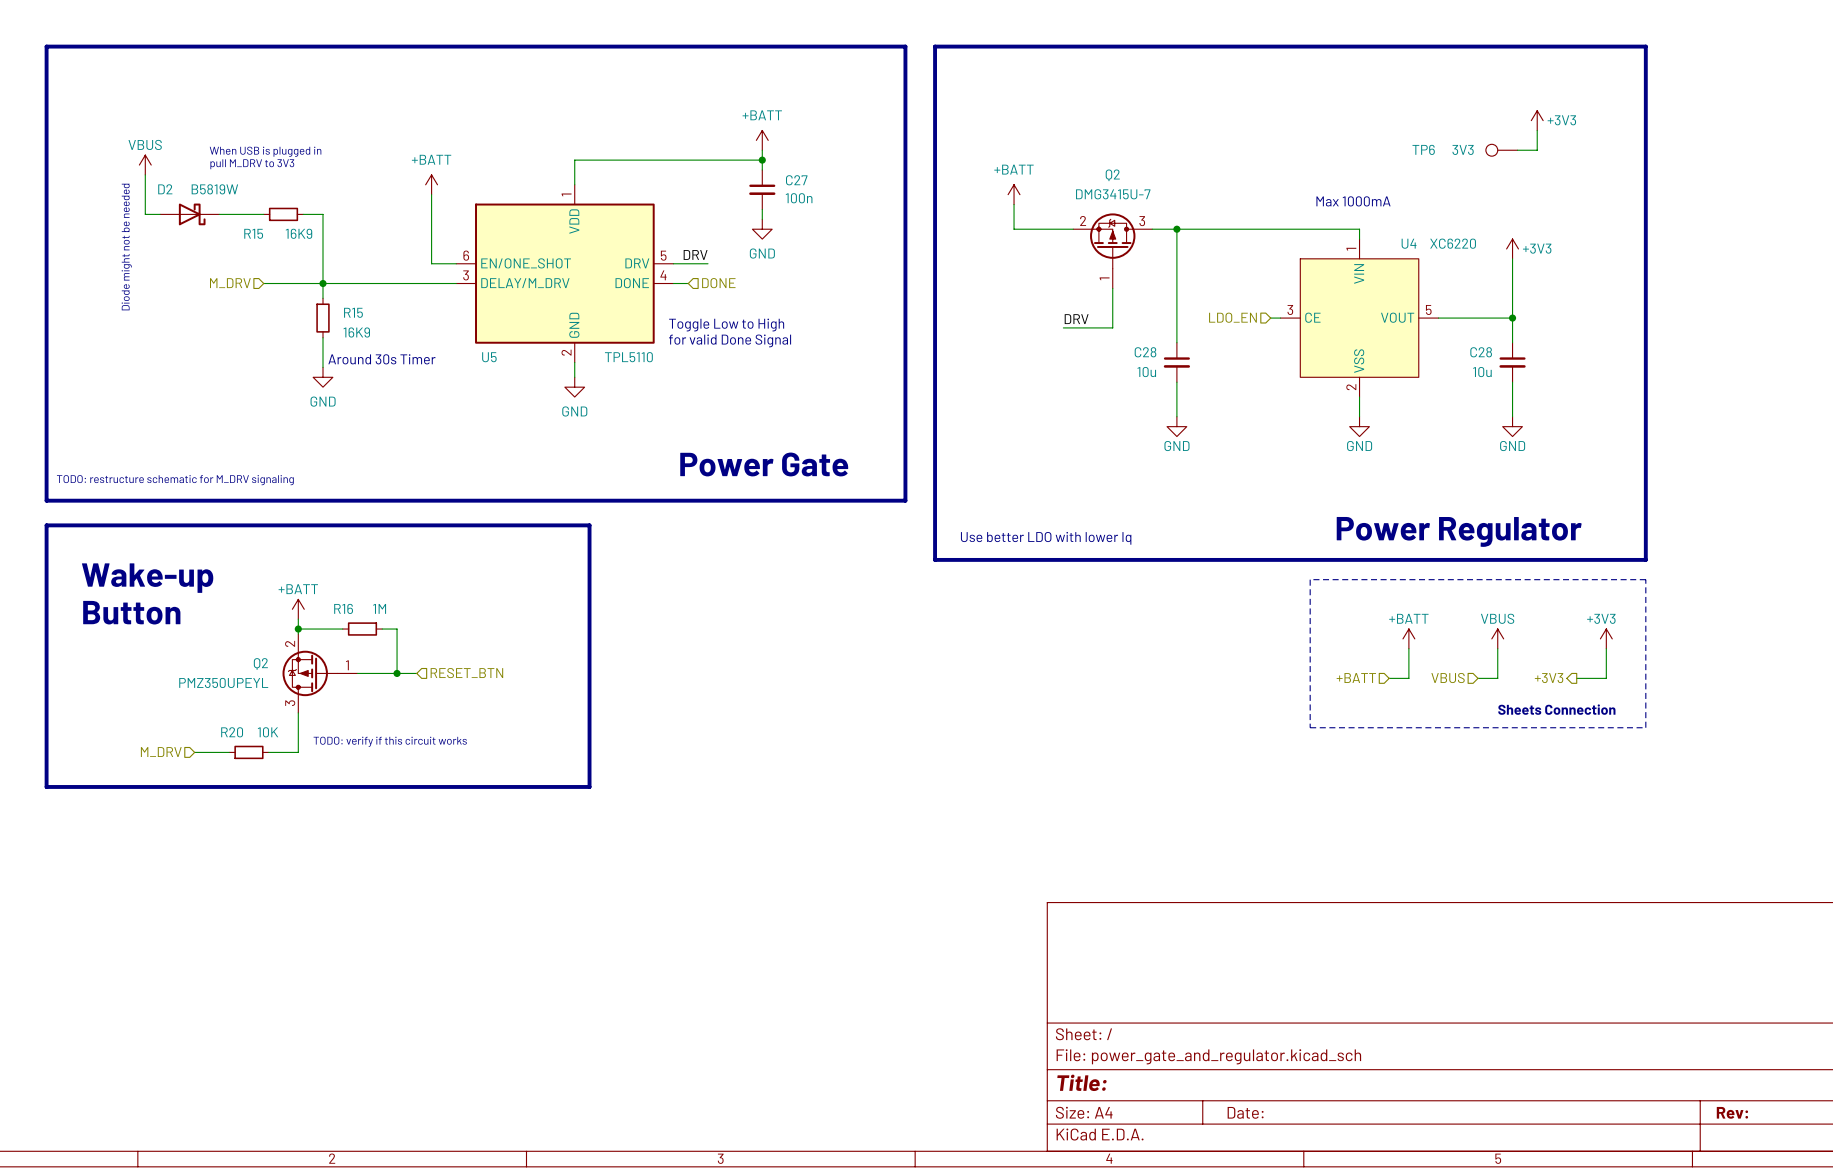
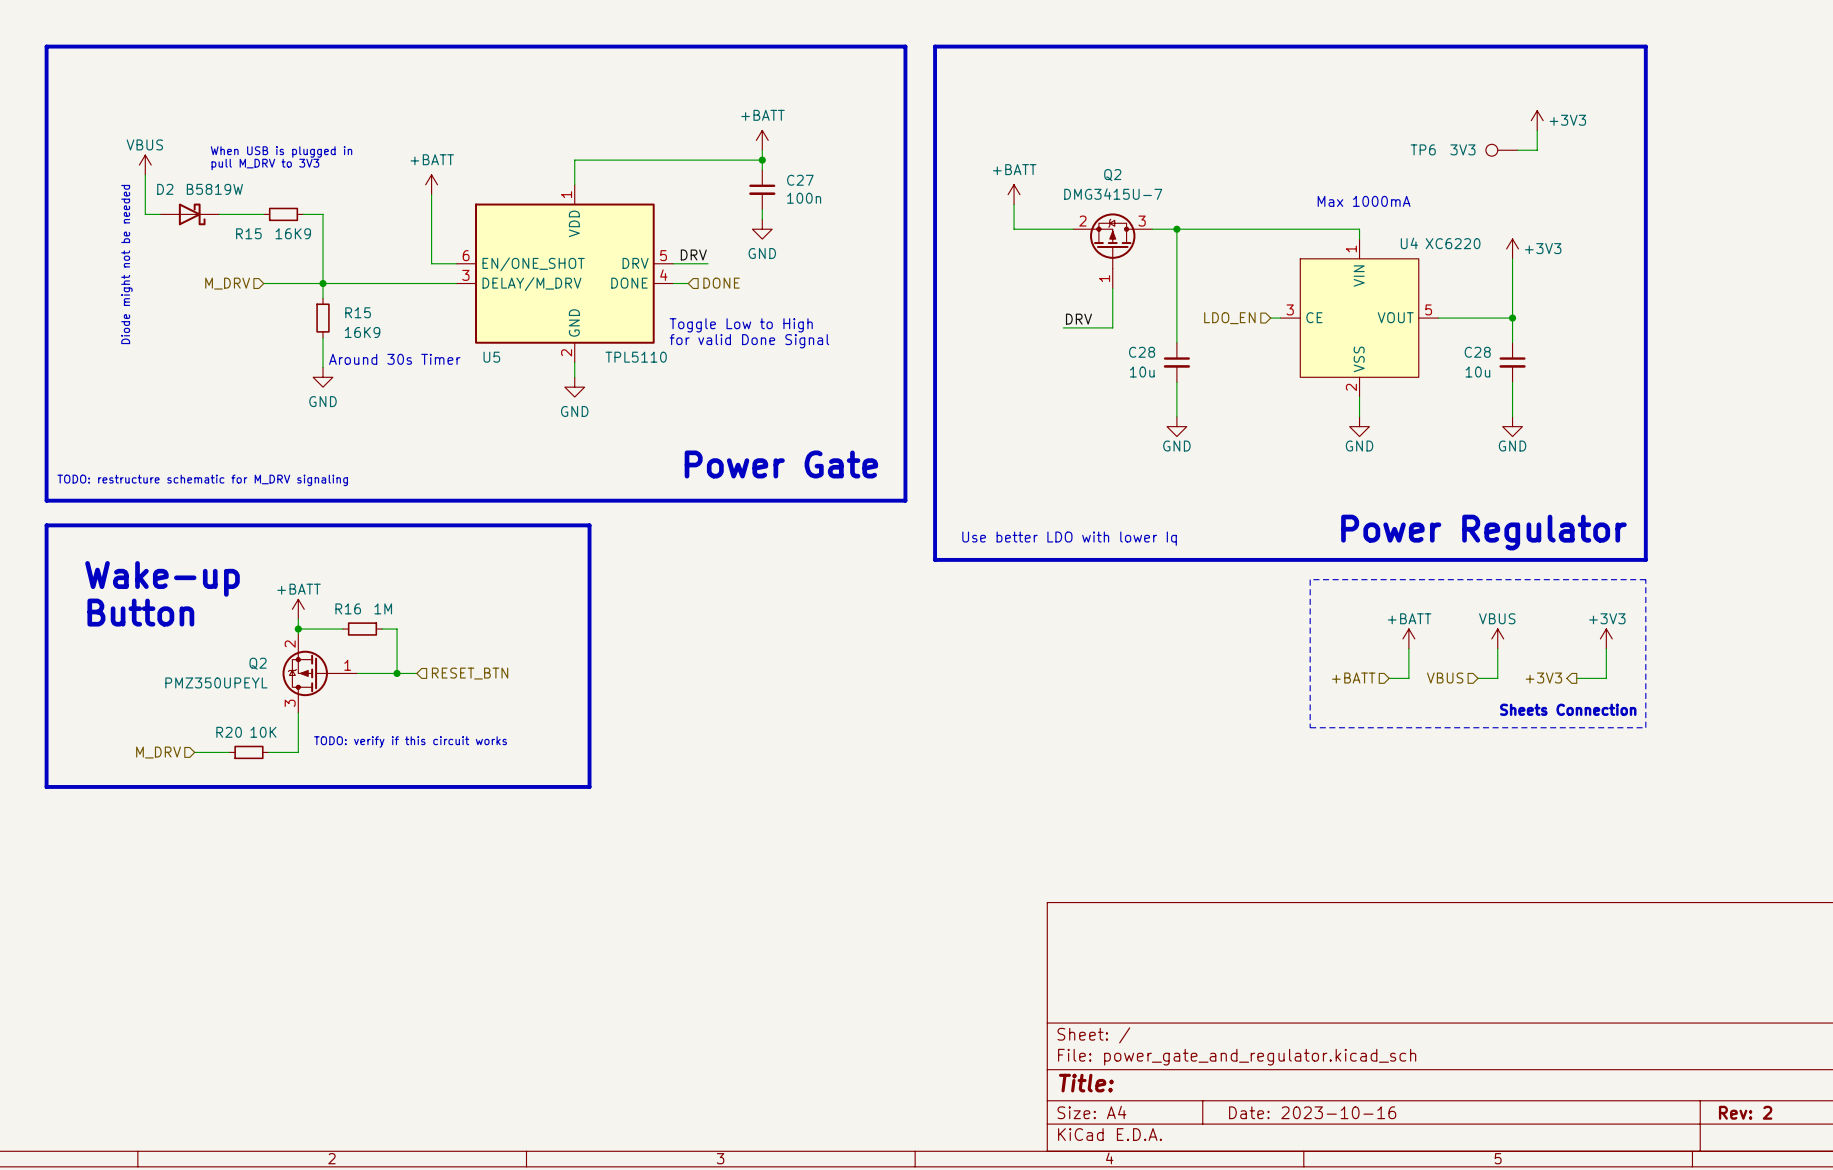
title block: Date: (1245, 1112) -> Date: 2023-10-16 (1312, 1112)
title block: Rev: (1732, 1112) -> Rev: 2 (1745, 1112)

